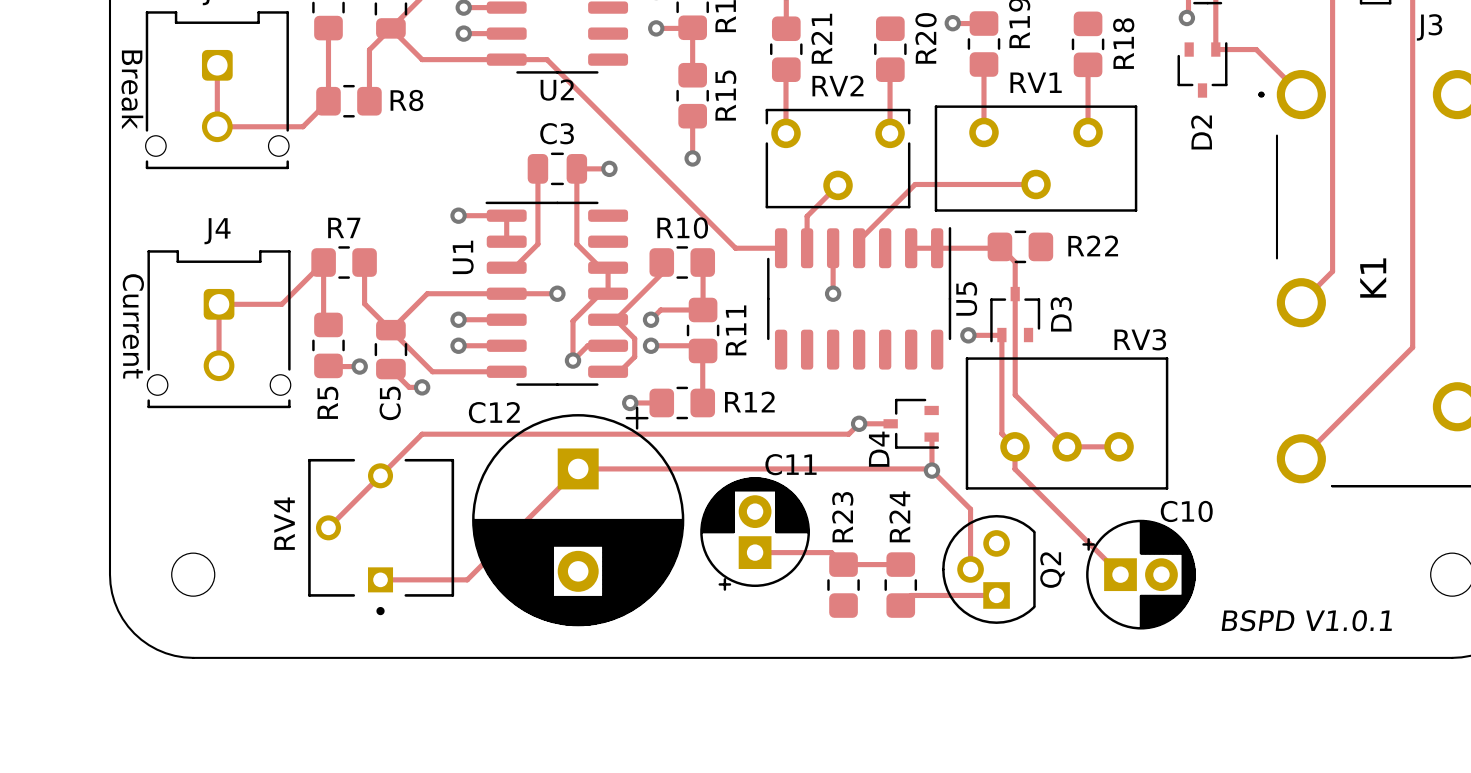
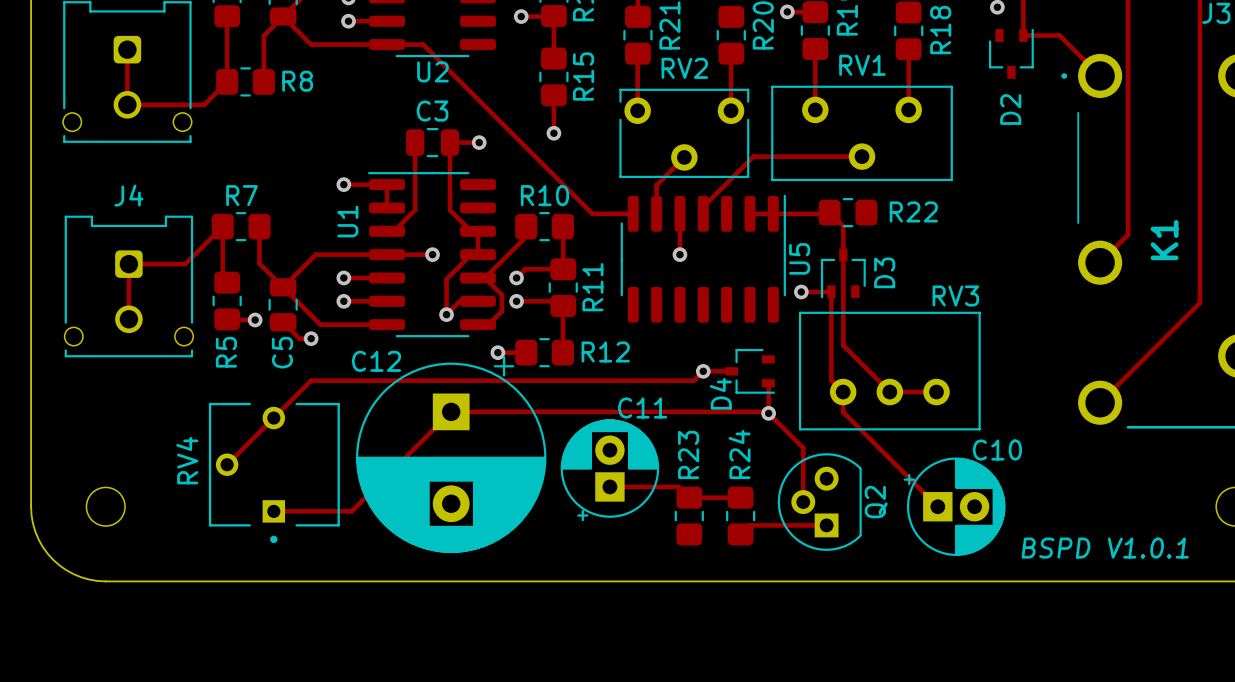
text: Break (132, 89) -> none
text: Current (133, 326) -> none

